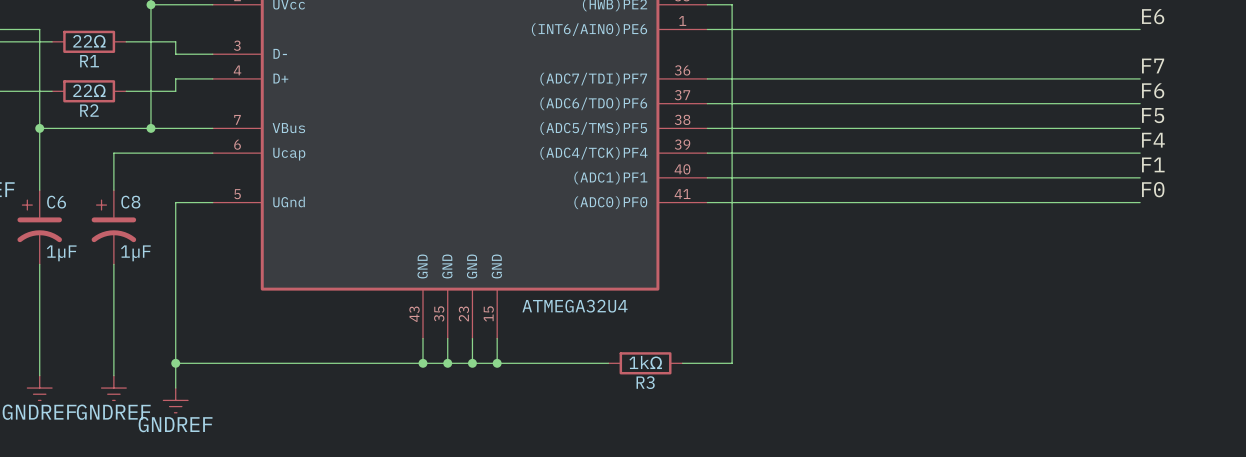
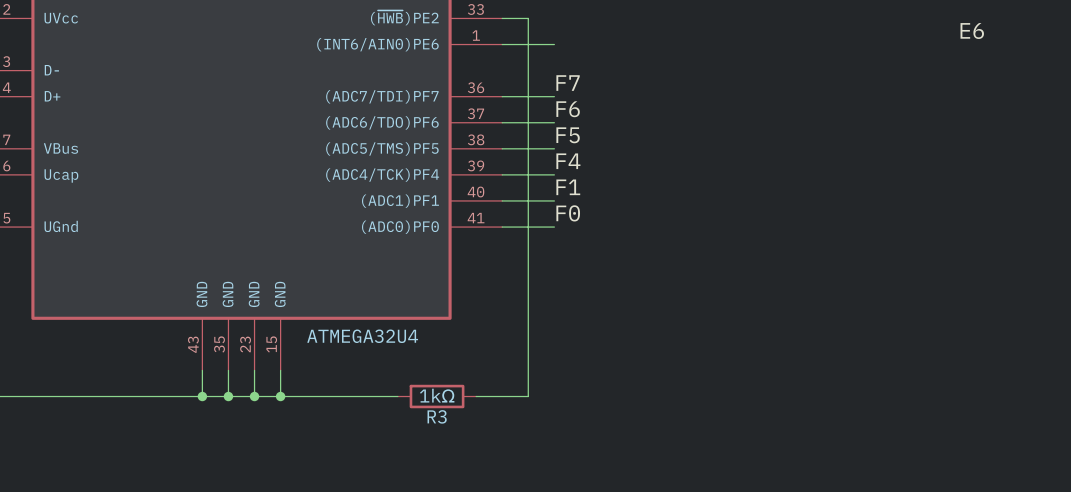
wire: (756, 29) (1140, 29) -> none
label: none -> F7 (568, 83)
label: F7 (1153, 66) -> none
wire: (756, 78) (1140, 78) -> none
label: none -> F6 (568, 109)
label: F6 (1153, 90) -> none
wire: (756, 103) (1140, 103) -> none
label: none -> F5 (568, 135)
label: F5 (1153, 115) -> none
wire: (756, 128) (1140, 128) -> none
label: none -> F4 (568, 161)
label: F4 (1153, 140) -> none
wire: (756, 153) (1140, 153) -> none
label: none -> F1 (568, 187)
label: F1 (1153, 164) -> none
wire: (756, 177) (1140, 177) -> none
label: none -> F0 (568, 213)
label: F0 (1153, 189) -> none
wire: (756, 202) (1140, 202) -> none

